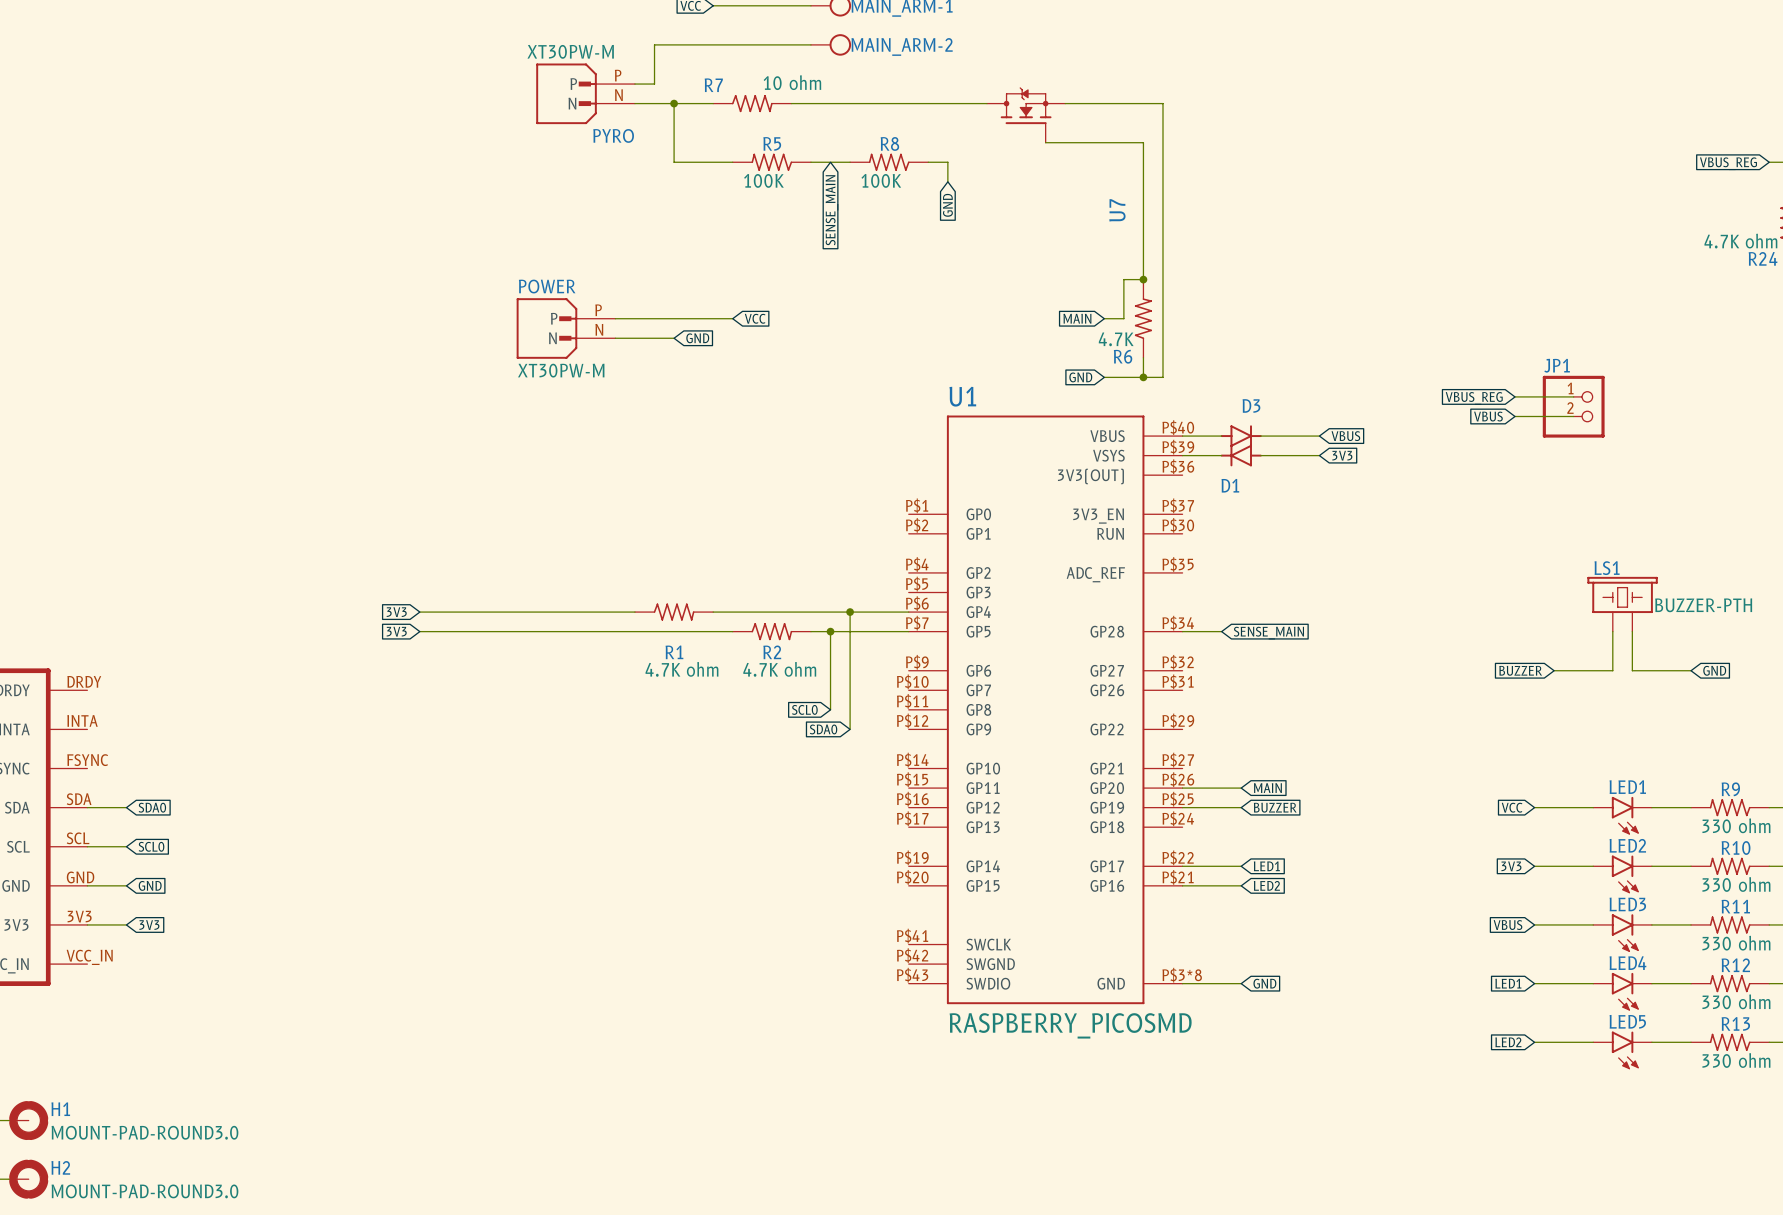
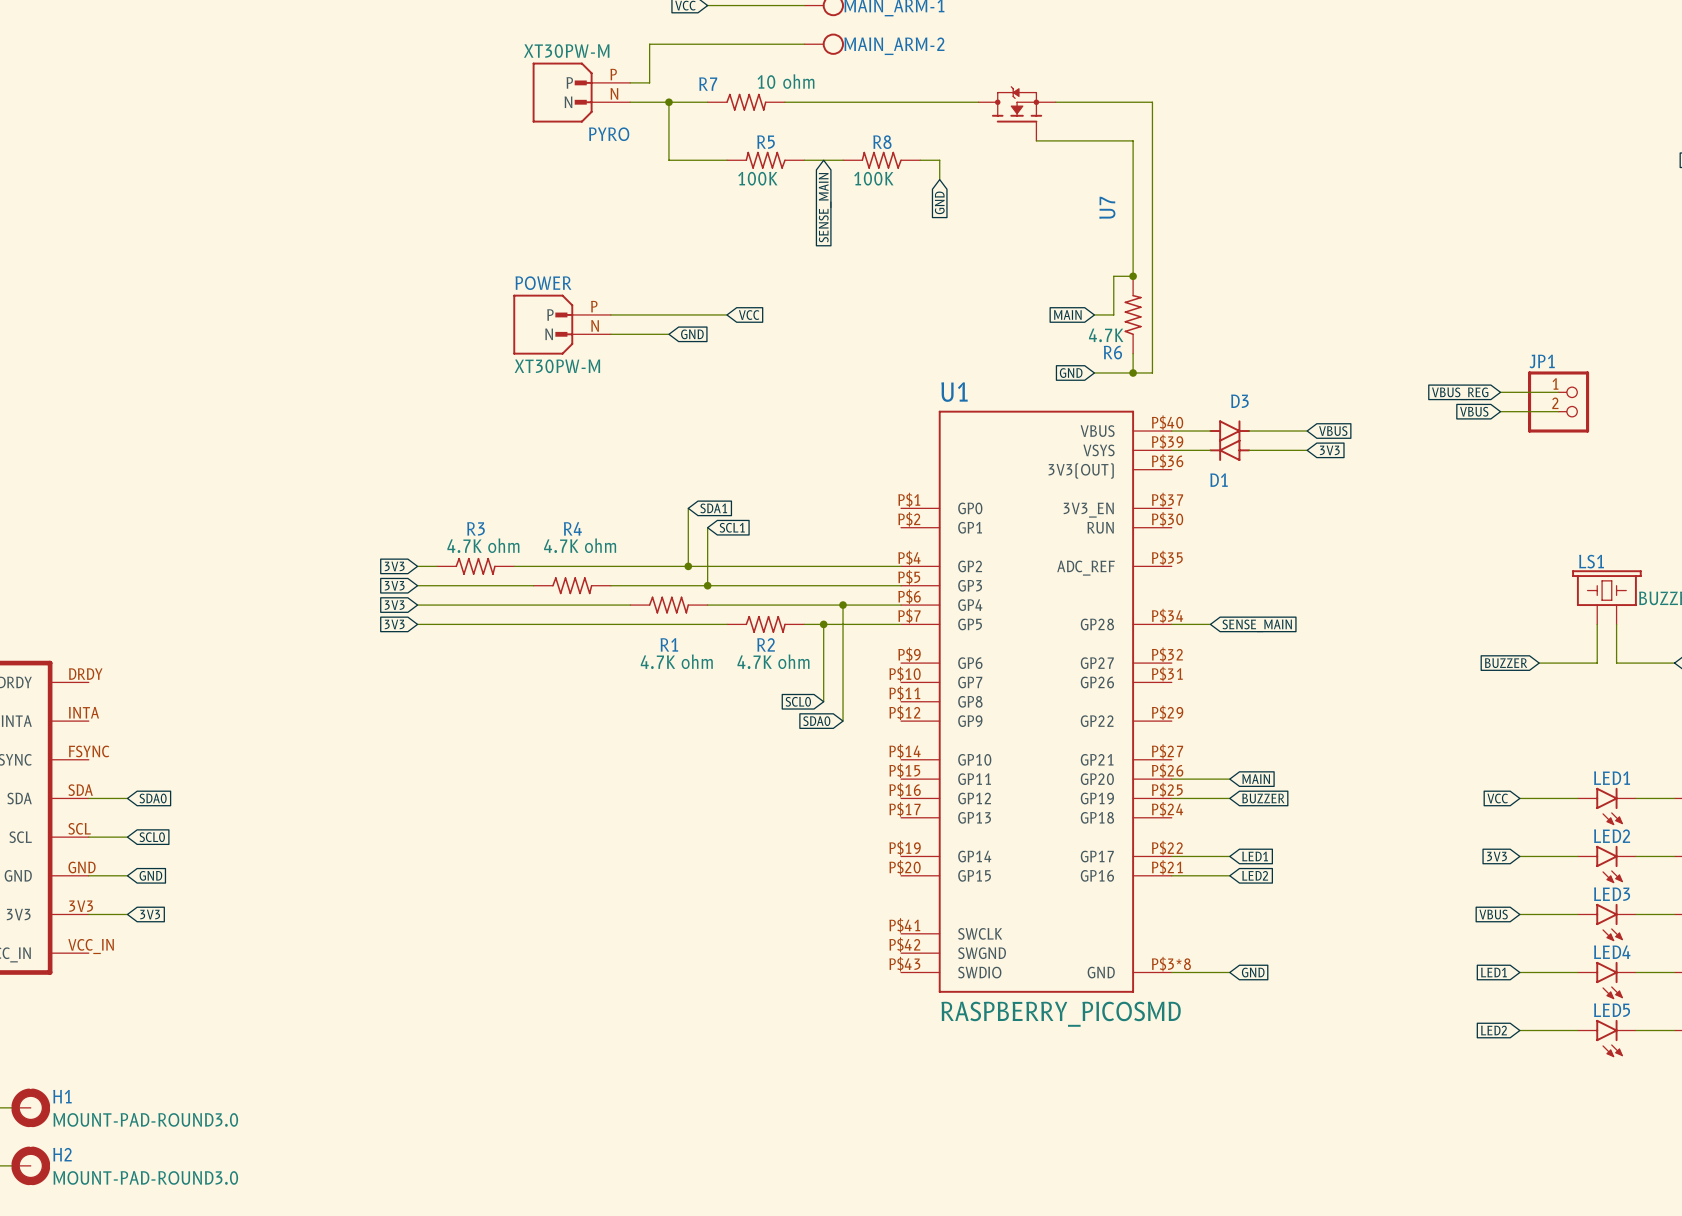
wire: none -> (688, 508) (688, 566)
global label: none -> SDA1 (713, 508)
wire: none -> (707, 527) (707, 585)
global label: none -> SCL1 (732, 527)
wire: none -> (417, 566) (436, 566)
R3: none -> 4.7K ohm (475, 566)
wire: none -> (514, 566) (901, 566)
junction: none -> (688, 566)
global label: none -> 3V3 (394, 566)
global label: none -> 3V3 (394, 585)
wire: none -> (417, 585) (533, 585)
R4: none -> 4.7K ohm (572, 585)
wire: none -> (610, 585) (901, 585)
junction: none -> (707, 585)

